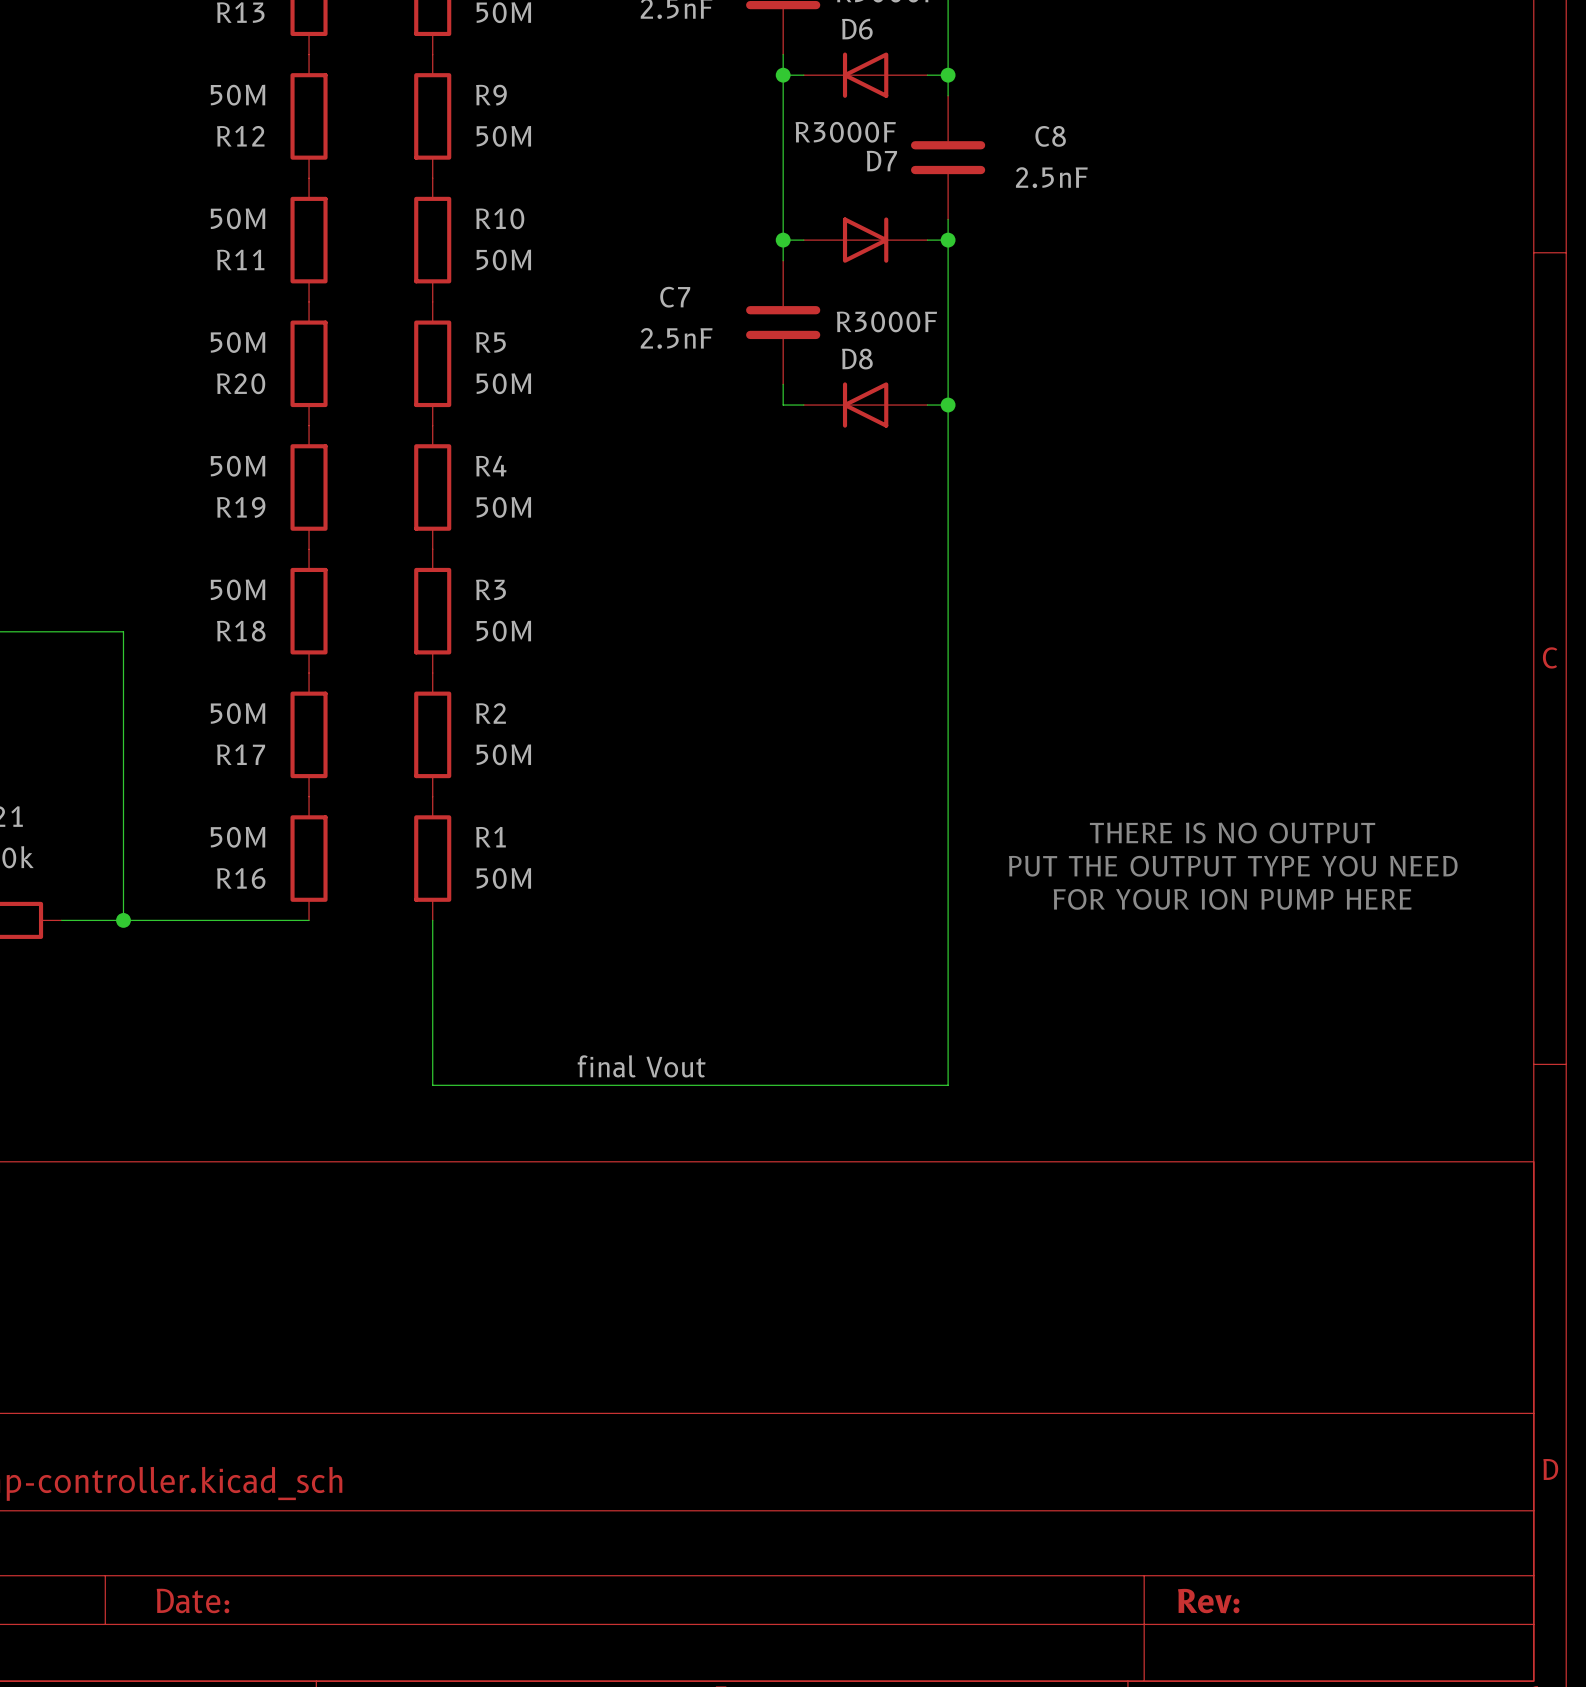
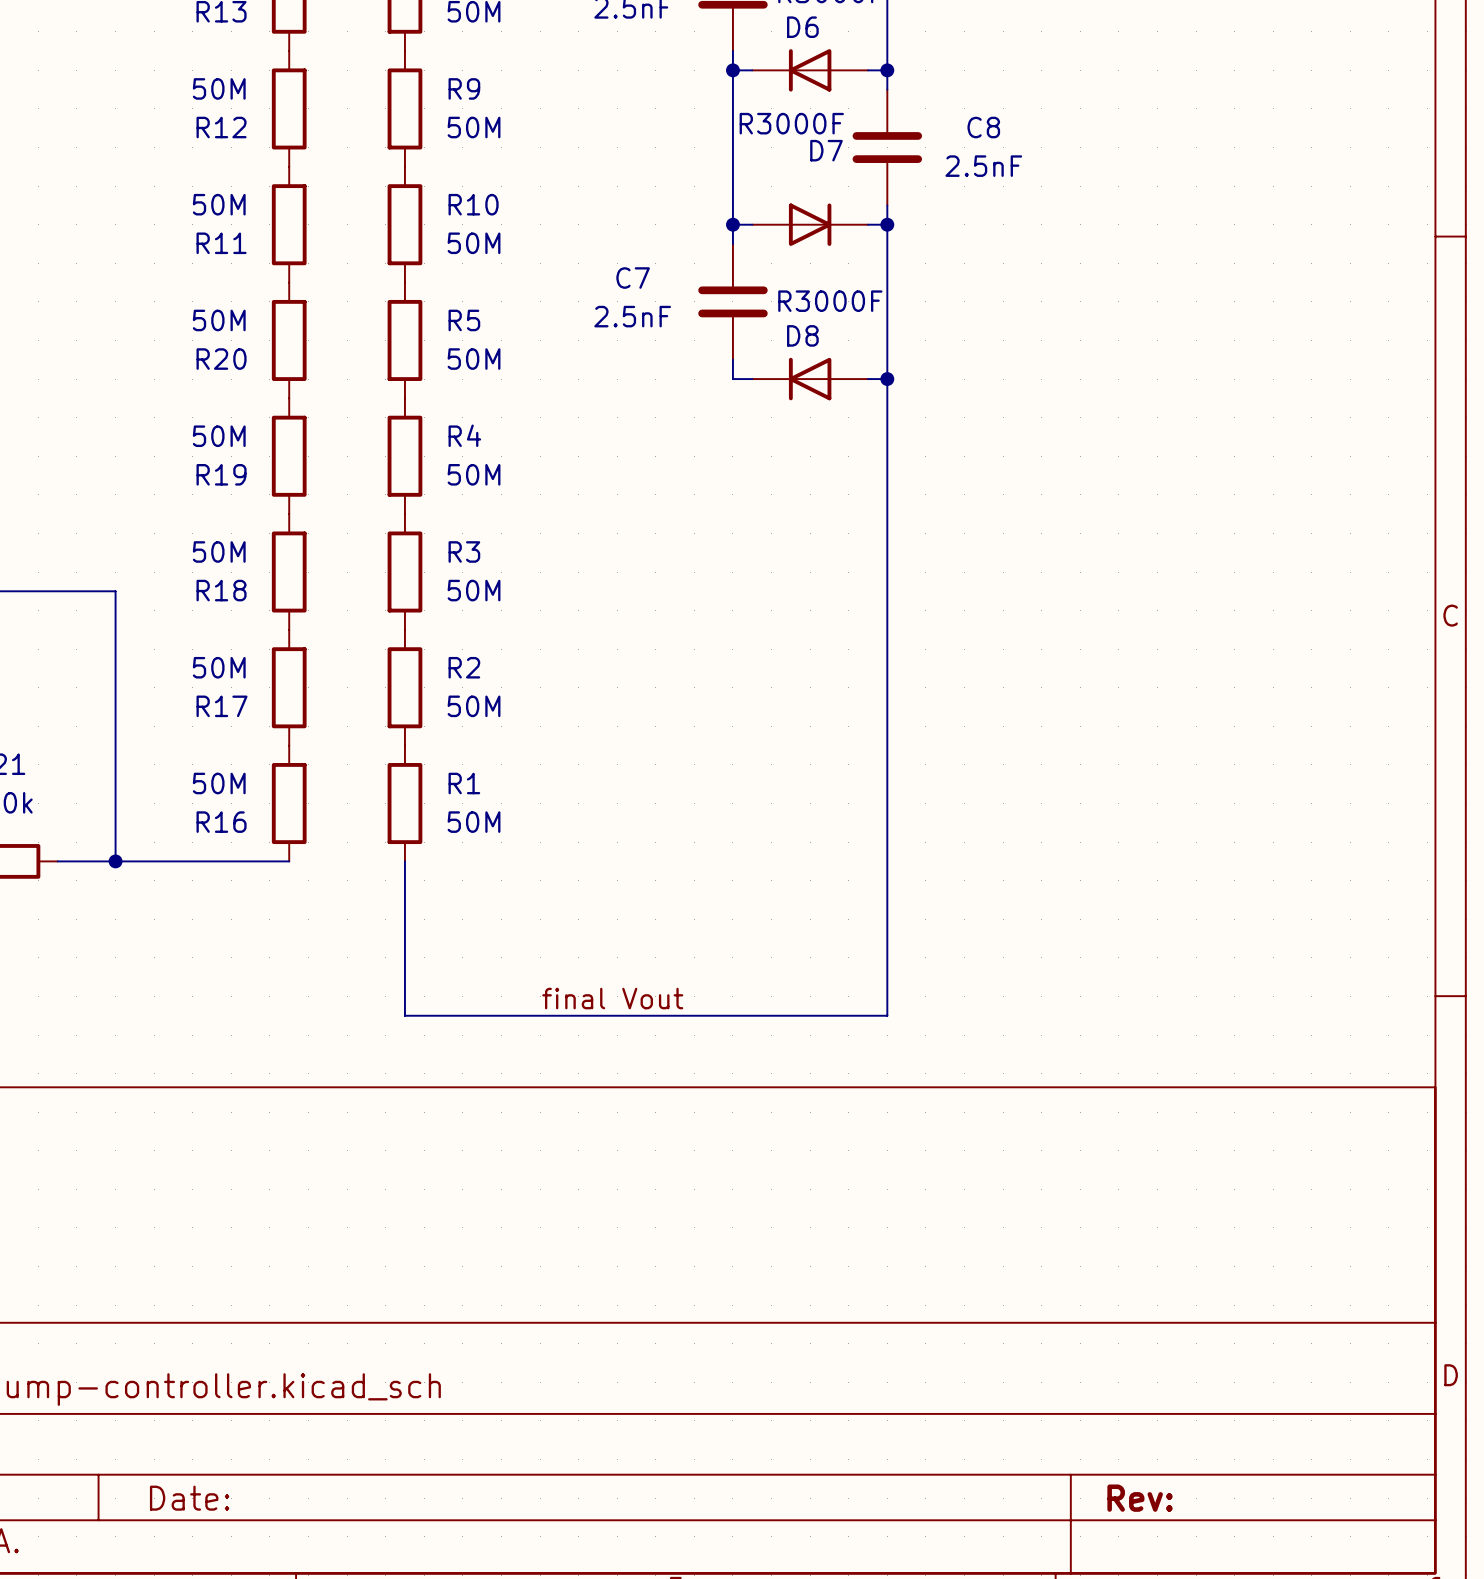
text: THERE IS NO OUTPUT (1232, 833) -> none
text: PUT THE OUTPUT TYPE YOU NEED (1233, 866) -> none
text: FOR YOUR ION PUMP HERE (1232, 899) -> none

